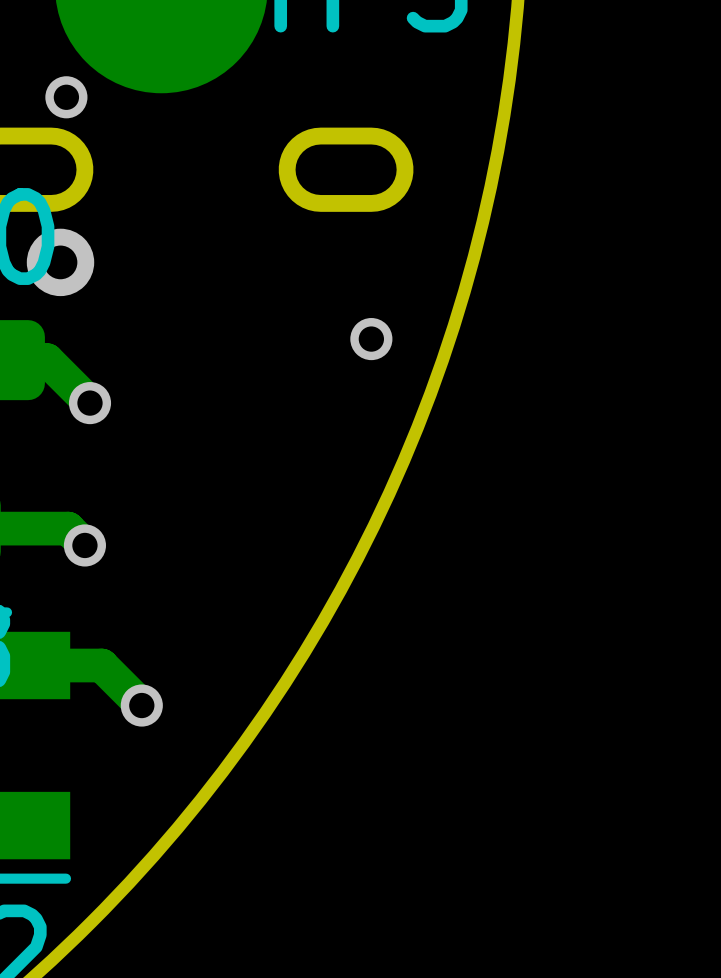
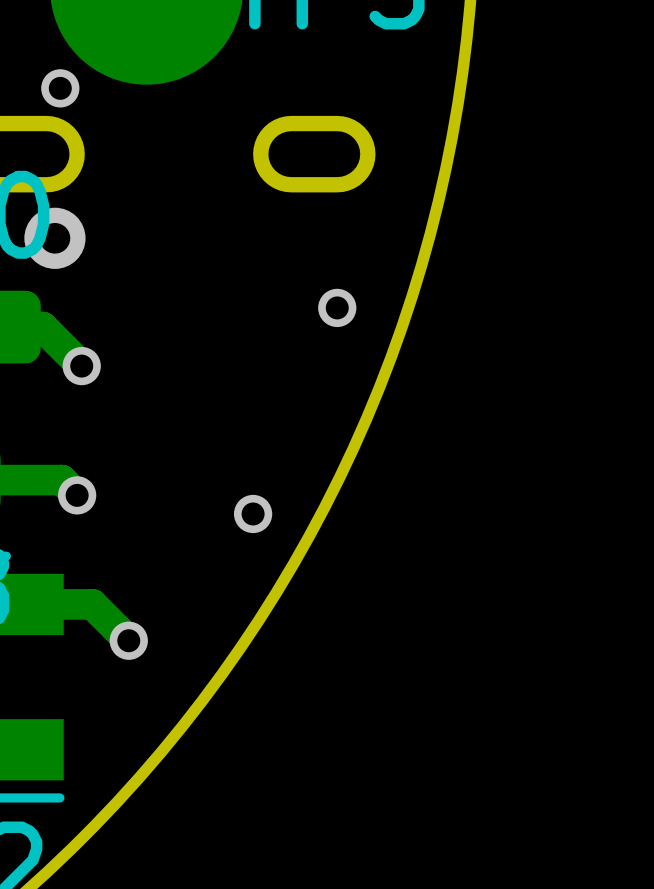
via: none -> (253, 513)

